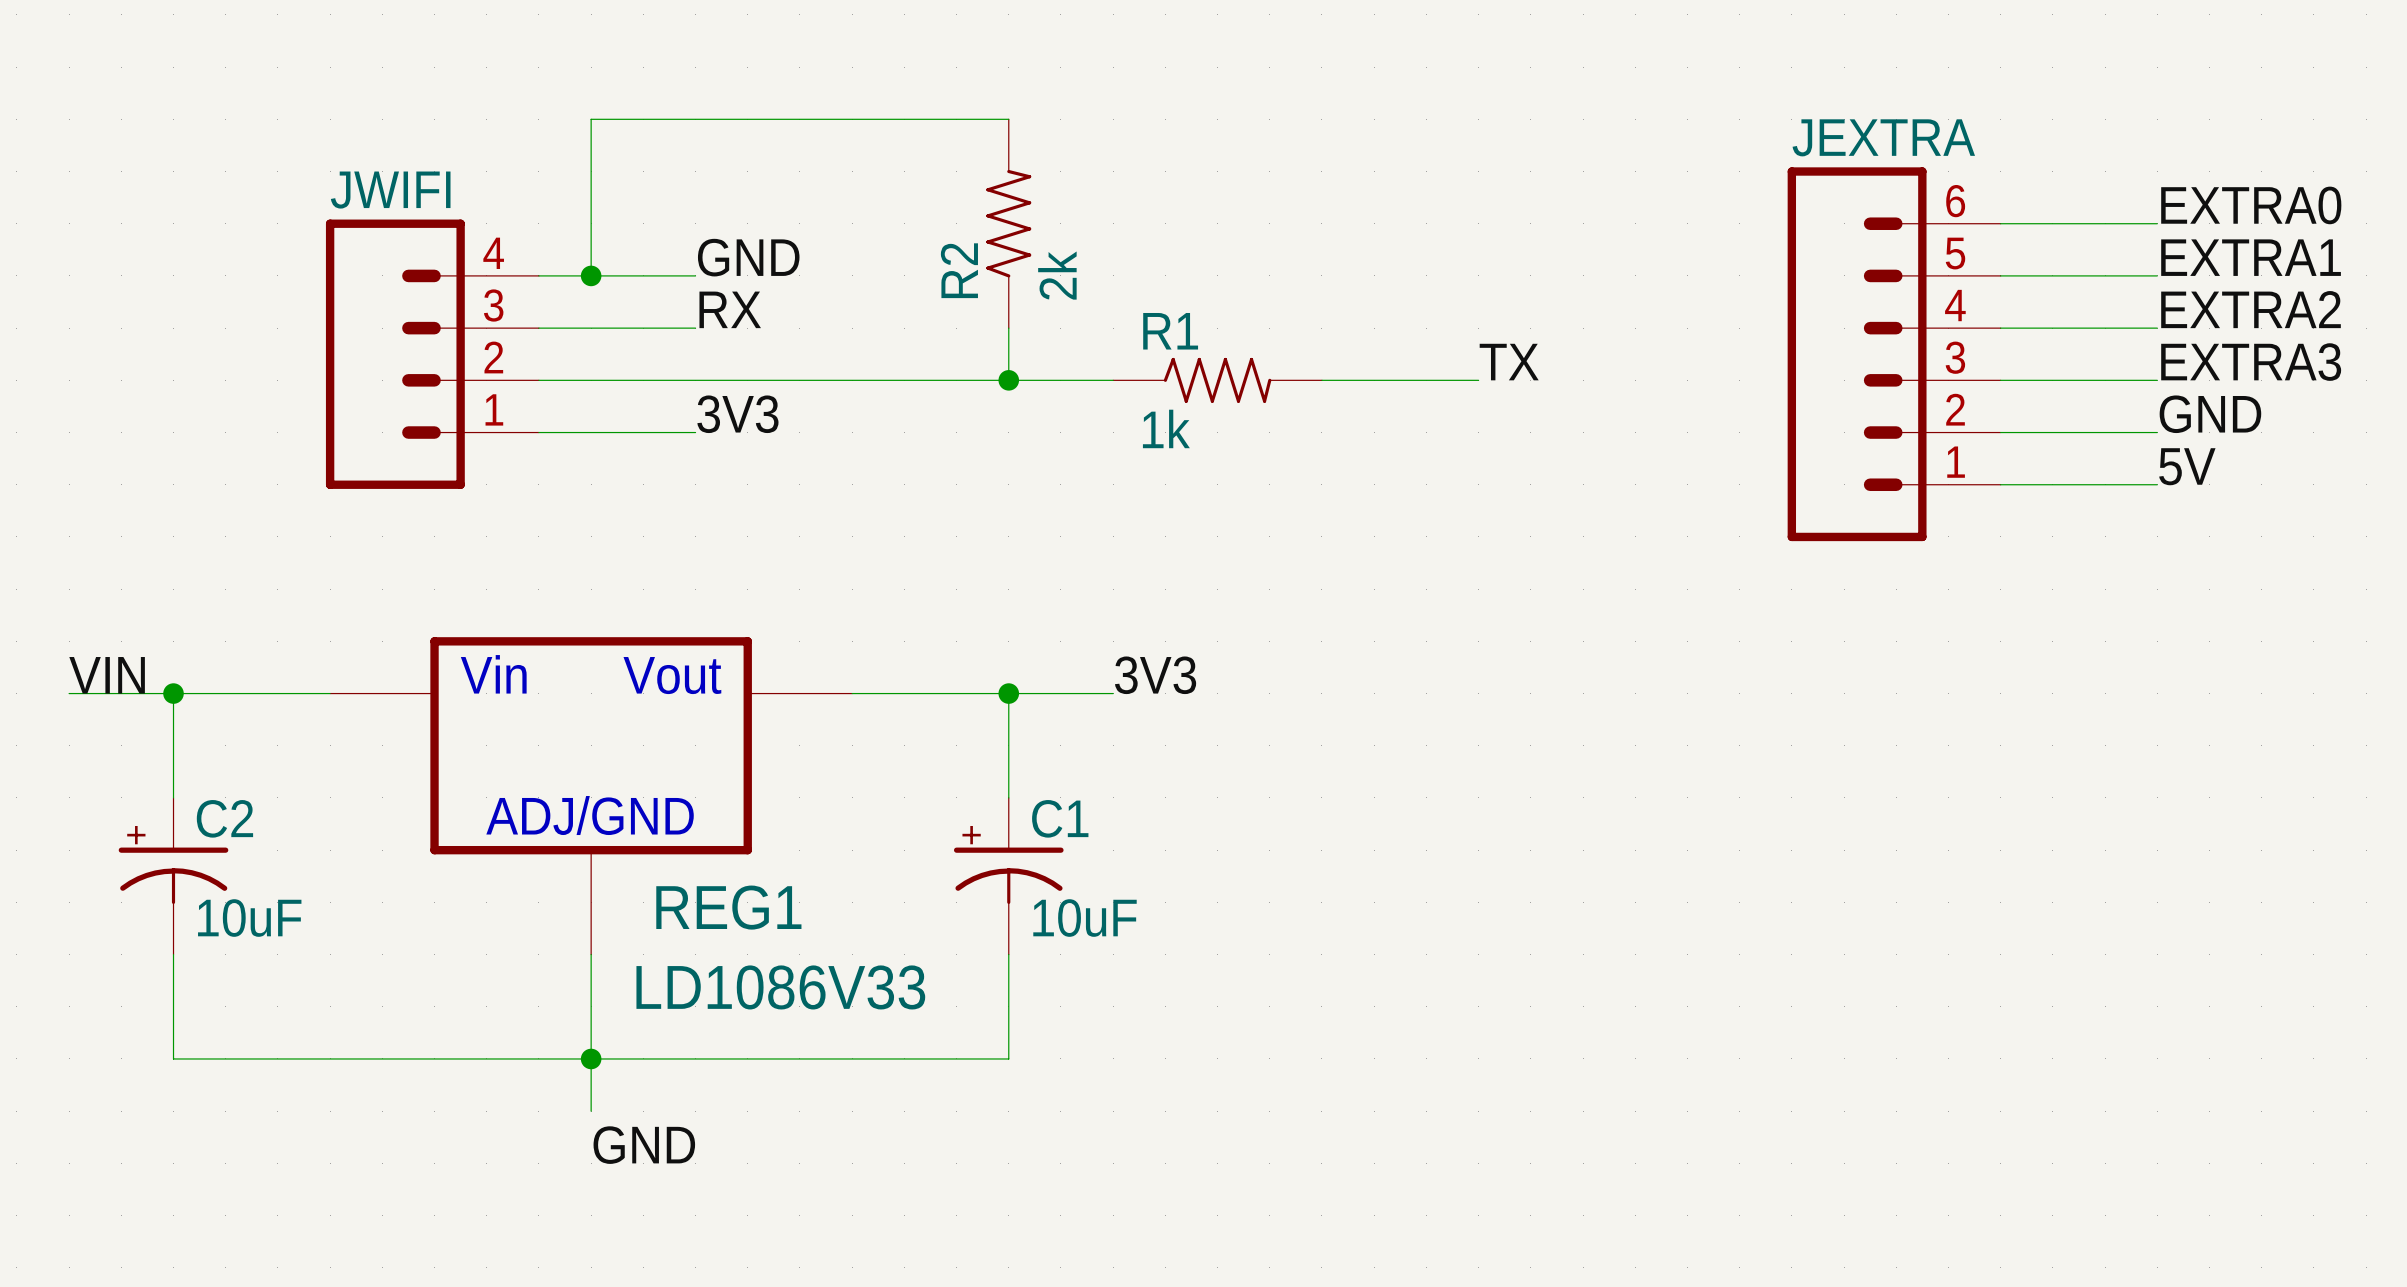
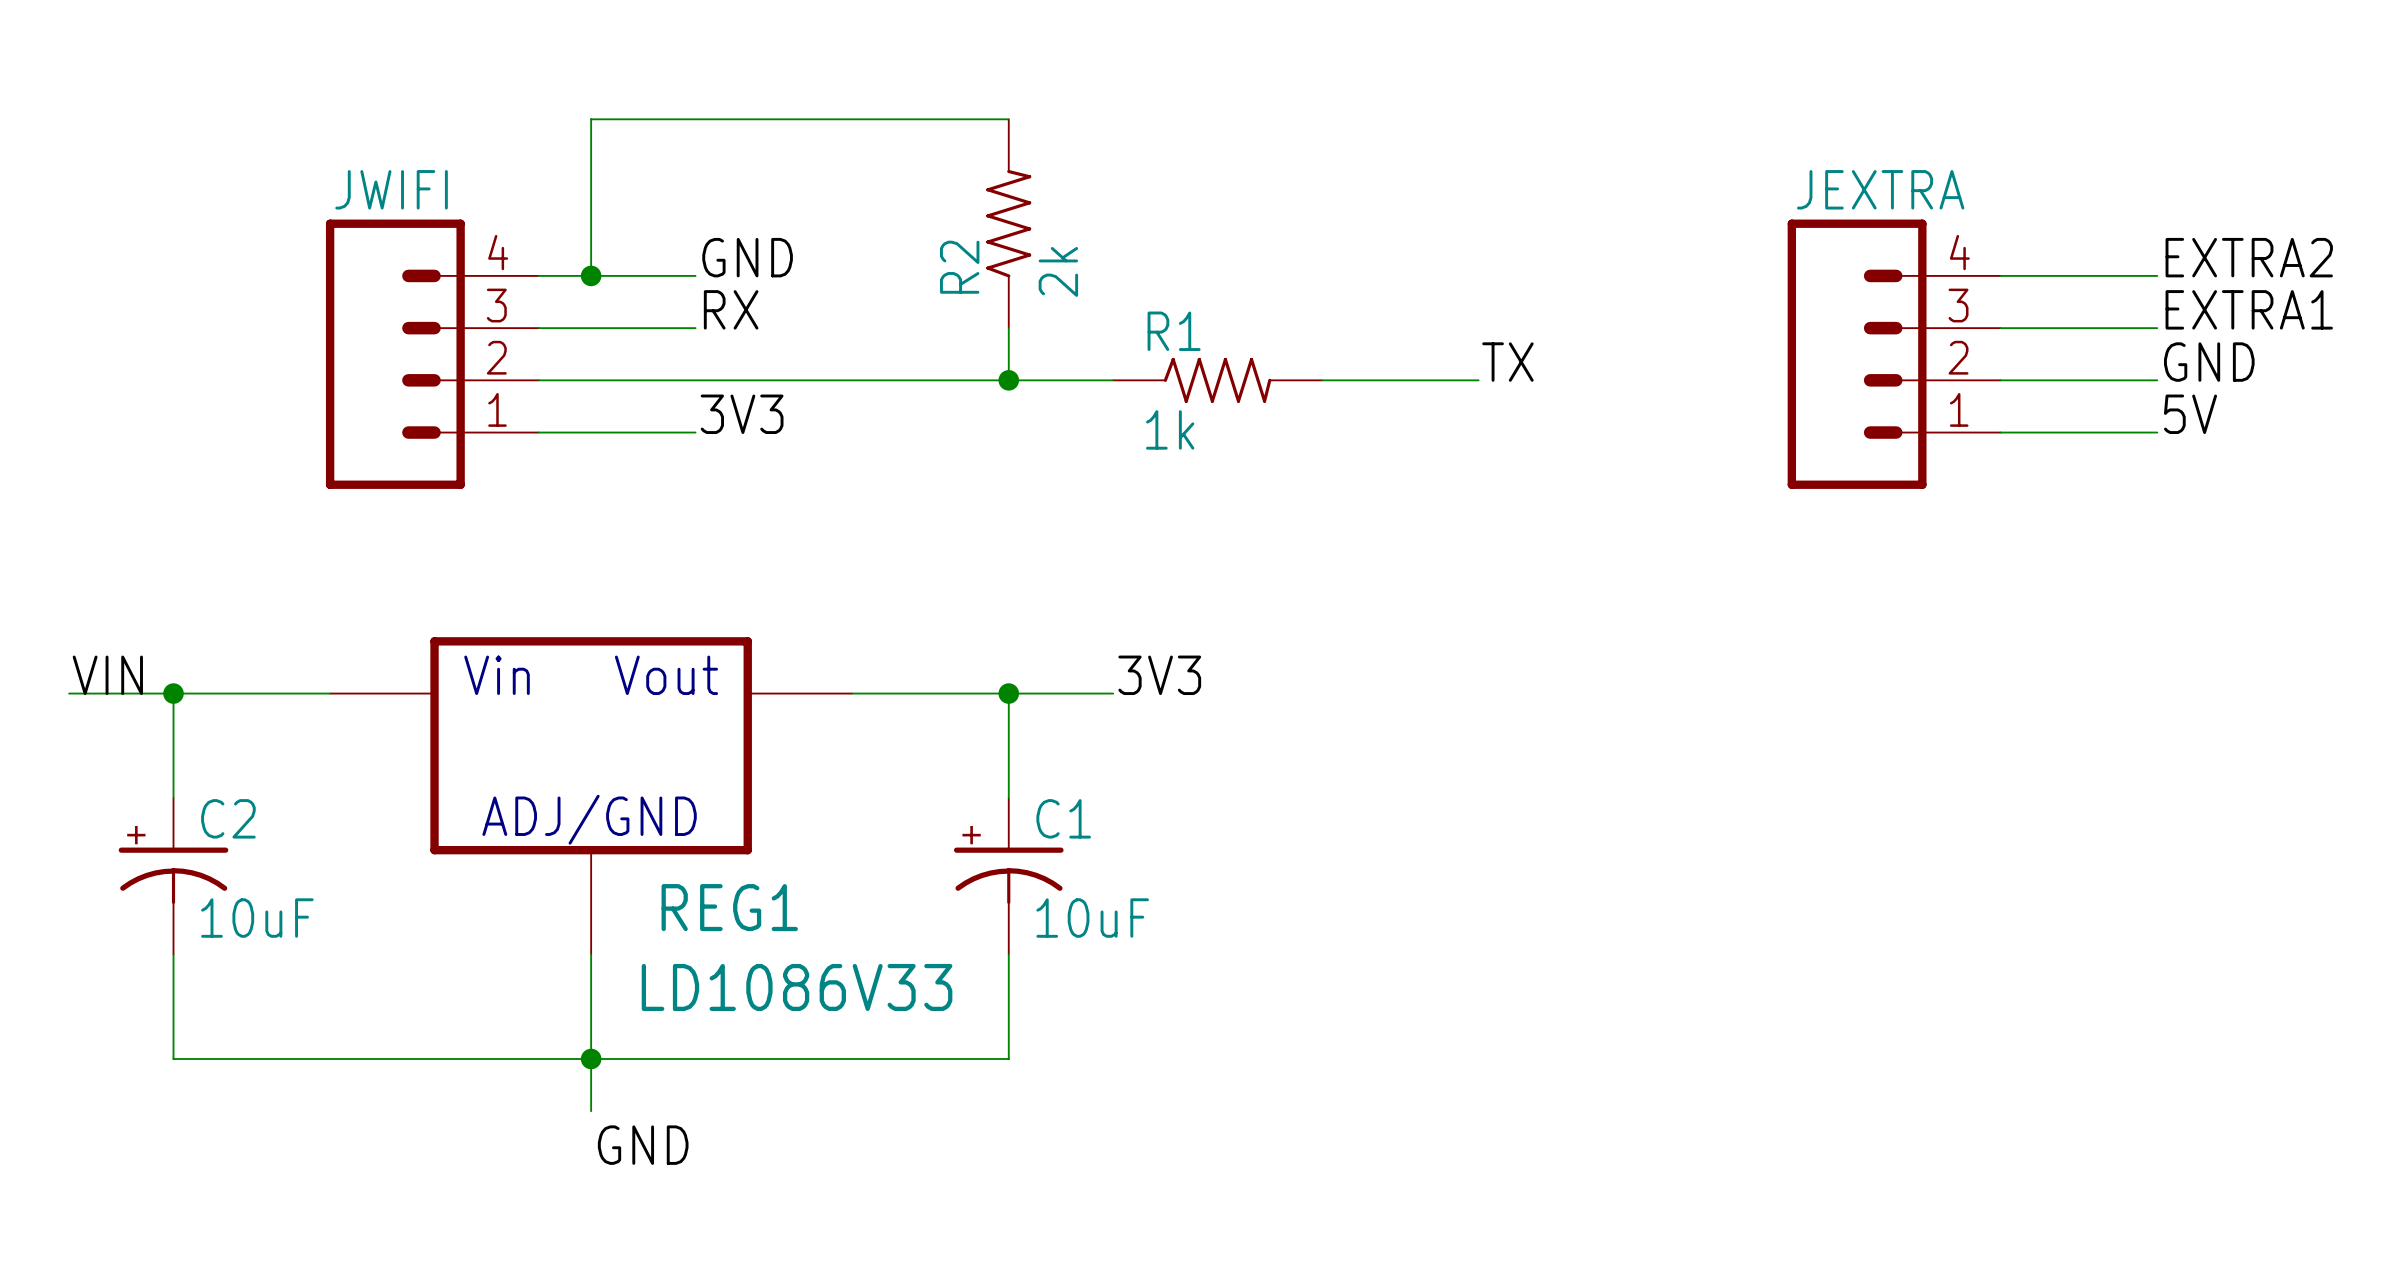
JEXTRA name position: JEXTRA (1883, 137) -> JEXTRA (1880, 189)
JEXTRA symbol: [1787, 167, 2001, 542] -> [1787, 219, 2001, 489]
label: EXTRA0 (2251, 205) -> none
wire: (2000, 223) (2157, 223) -> none
label: EXTRA1 (2251, 257) -> EXTRA2 (2249, 257)
label: EXTRA2 (2251, 309) -> EXTRA1 (2249, 309)
label: EXTRA3 (2251, 362) -> GND (2209, 362)
label: GND (2210, 414) -> 5V (2190, 414)
label: 5V (2187, 466) -> none
wire: (2000, 484) (2157, 484) -> none

